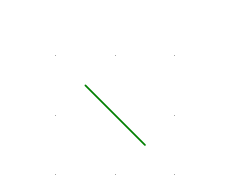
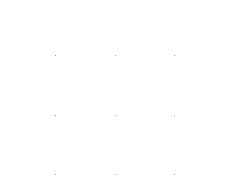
wire: (85, 85) (144, 144) -> none

